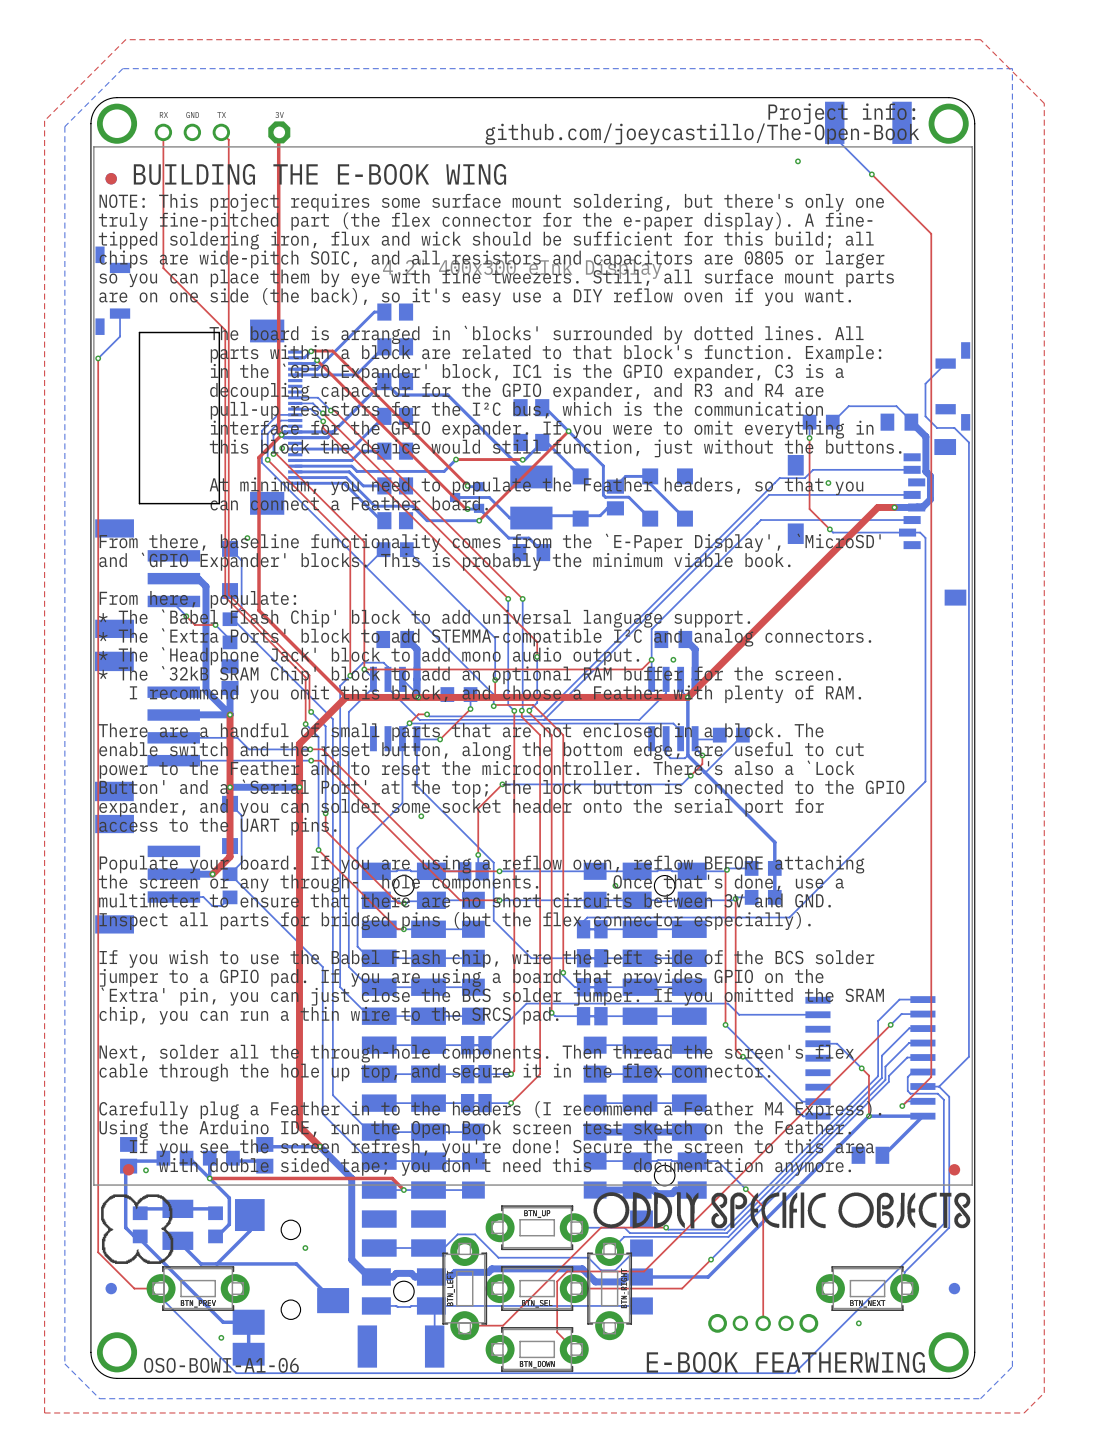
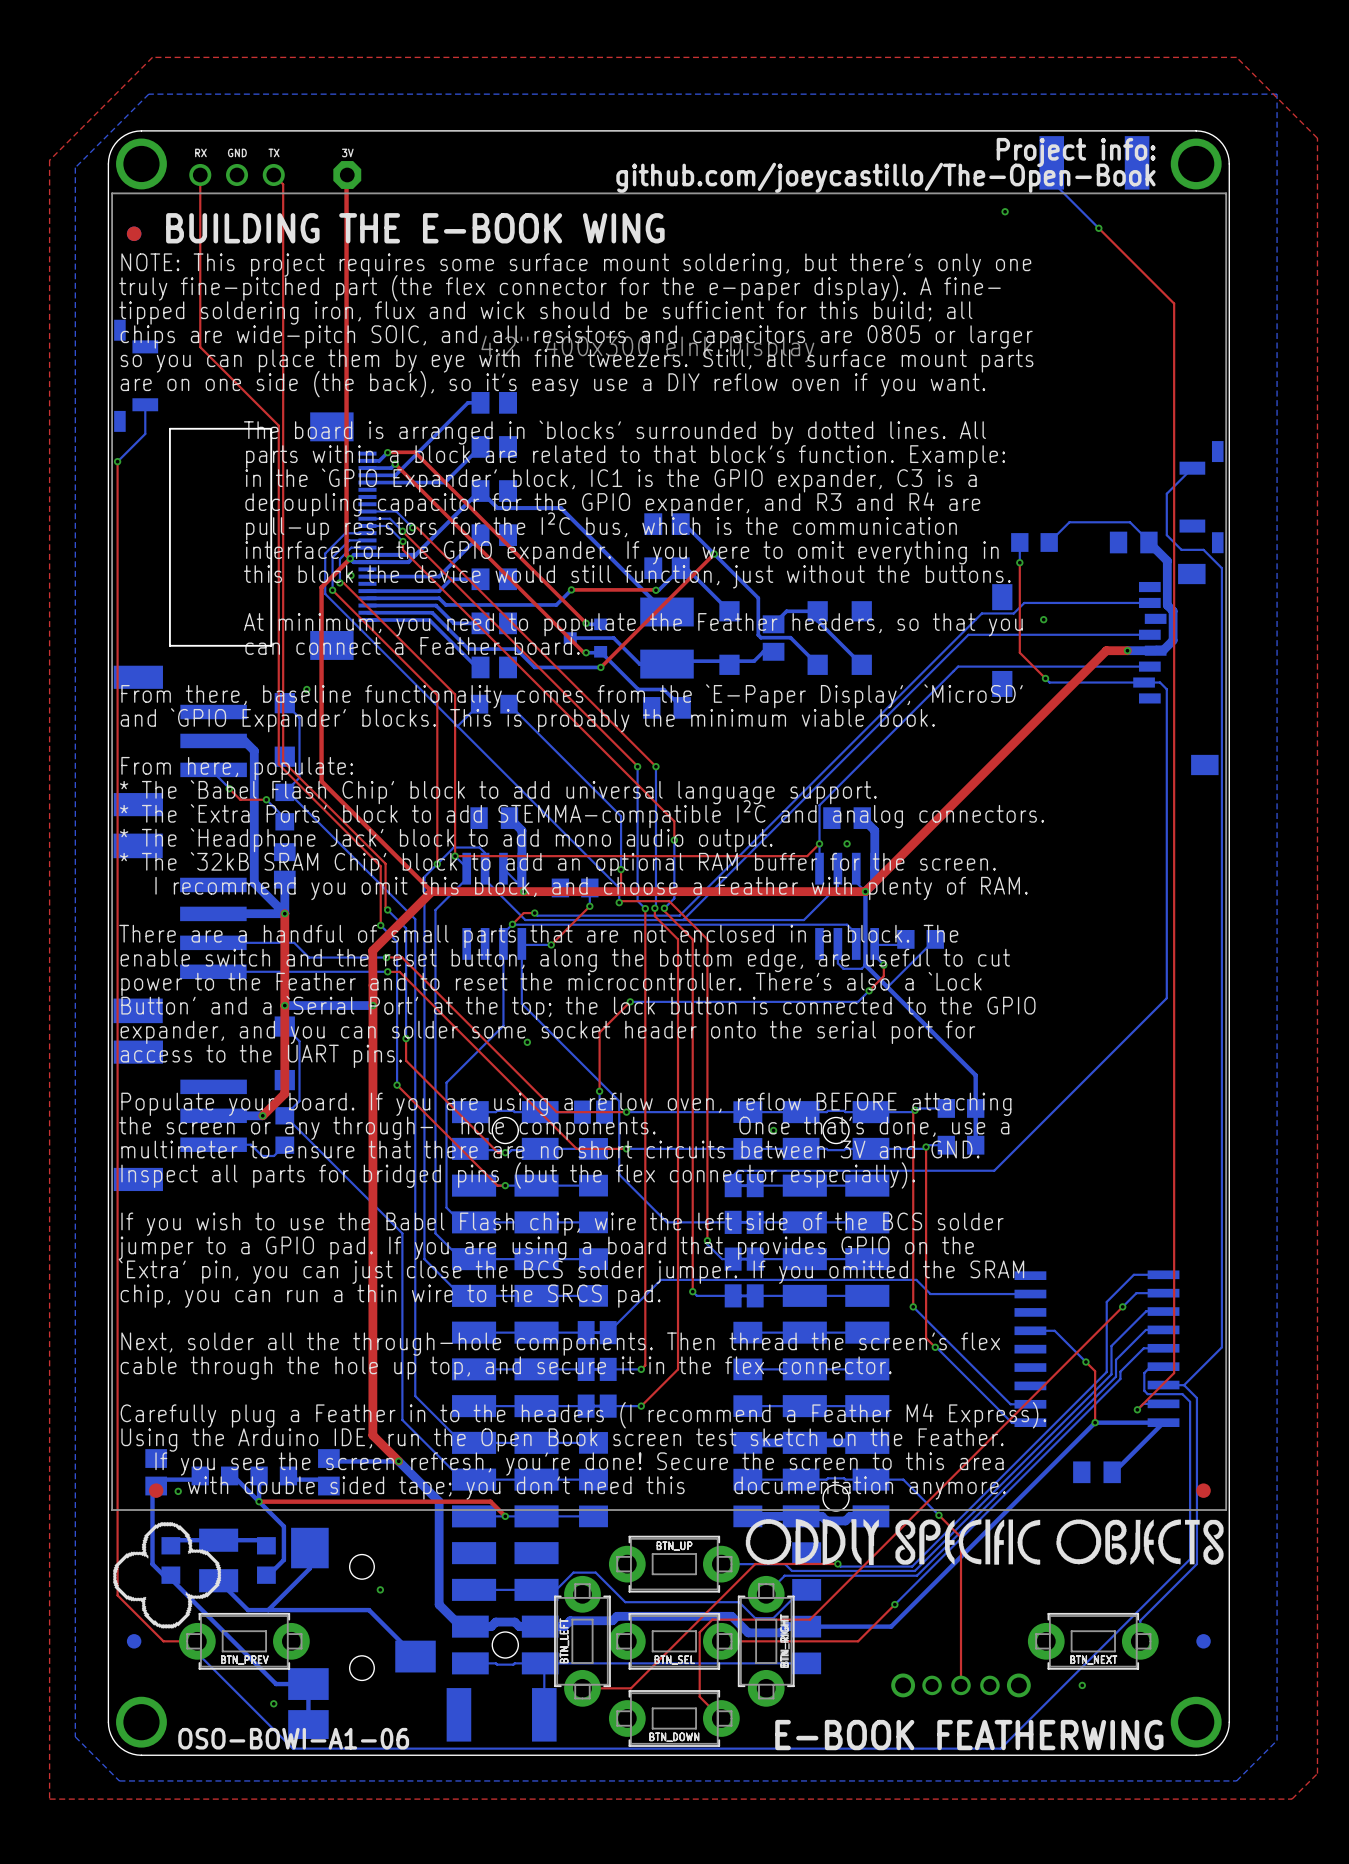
drawing shape: [101, 1194, 174, 1264] -> [112, 1521, 222, 1629]

